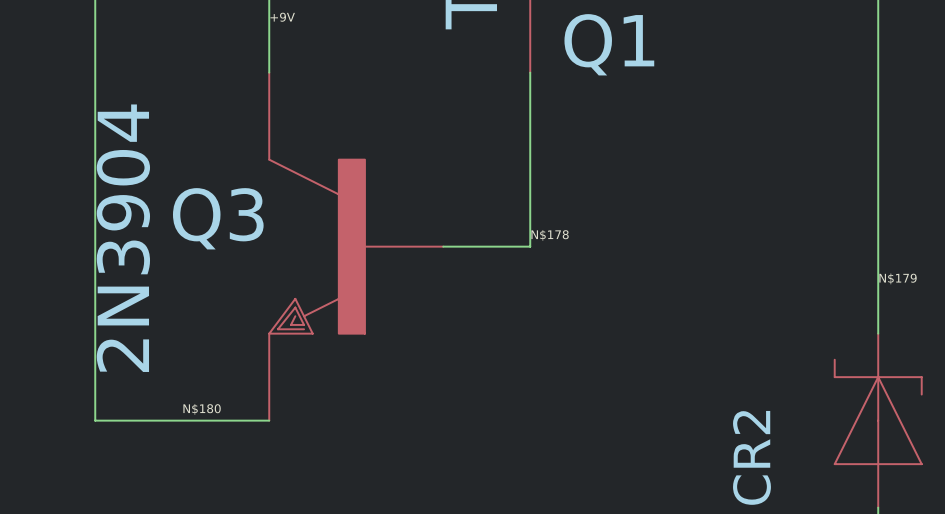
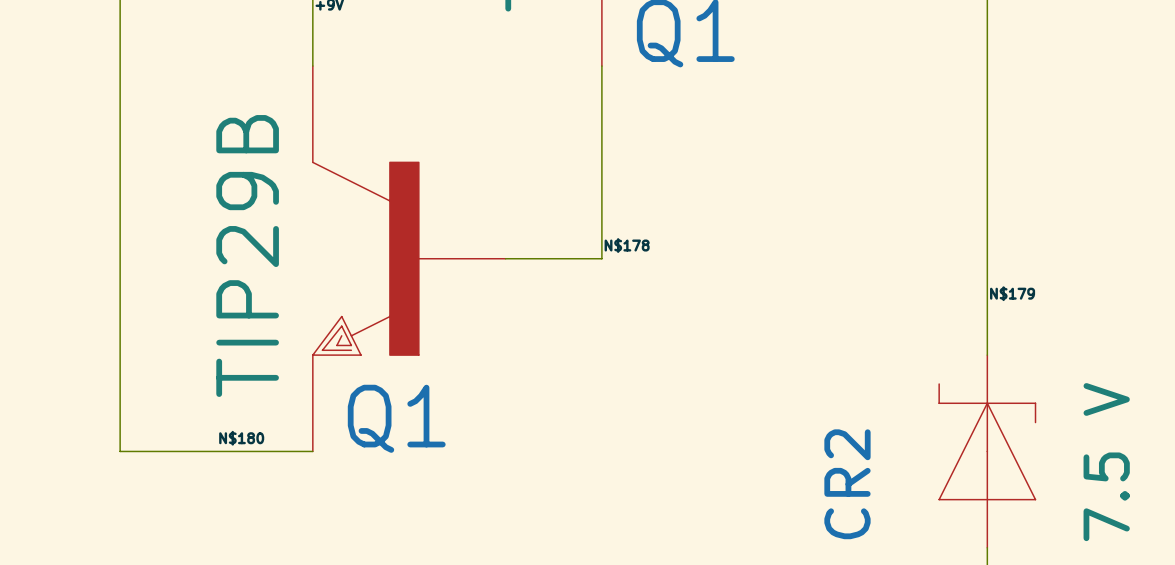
Q3 name: Q3 (218, 218) -> Q1 (396, 418)
Q3 value: 2N3904 (123, 238) -> TIP29B (247, 255)

